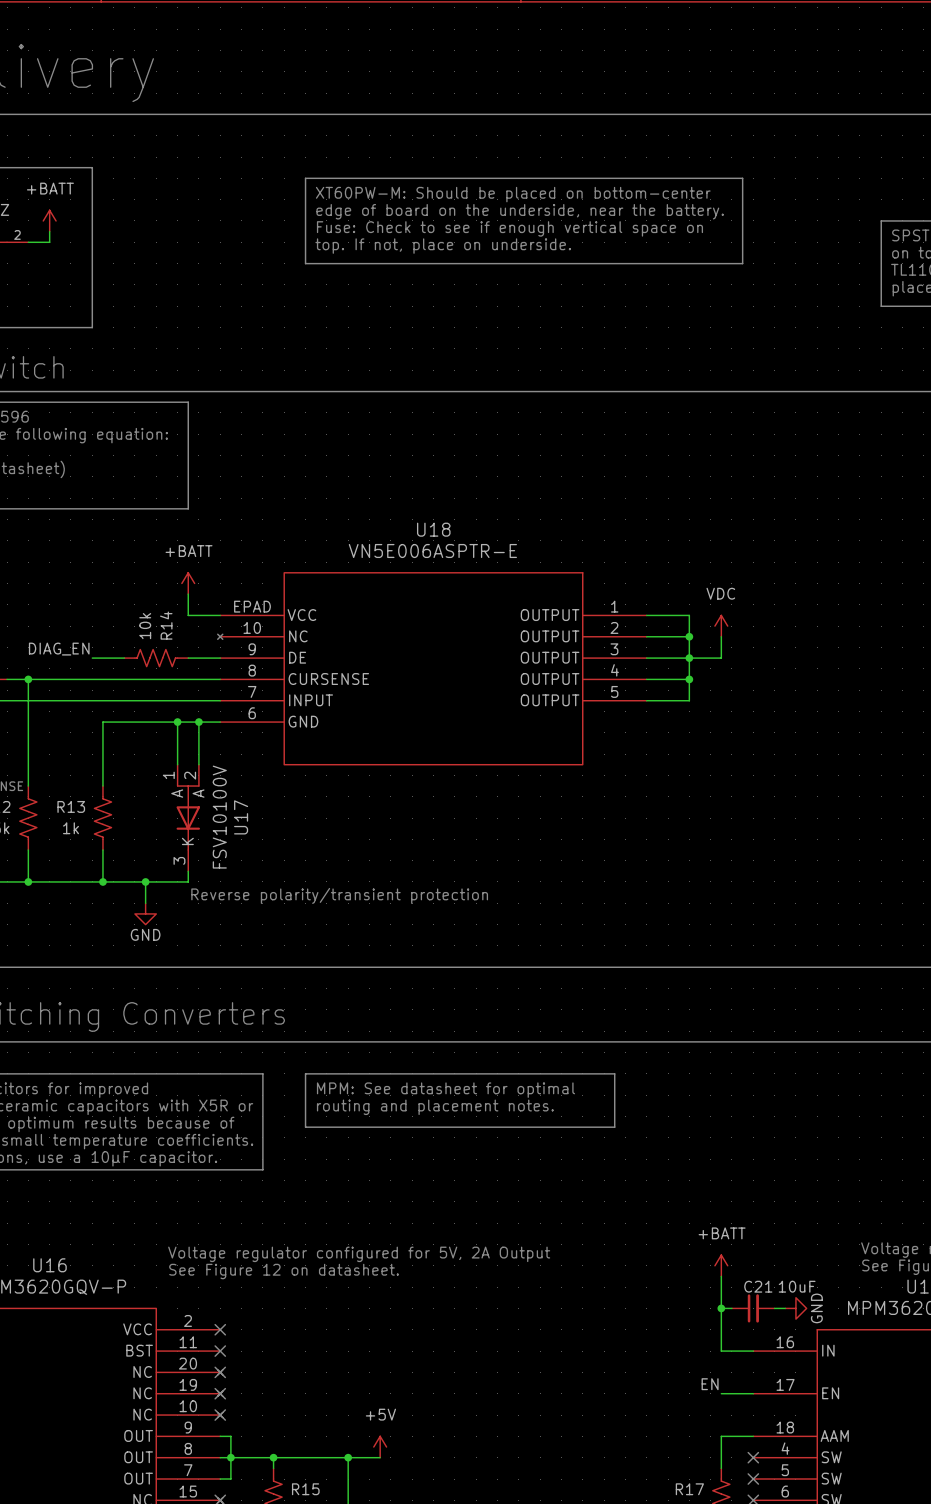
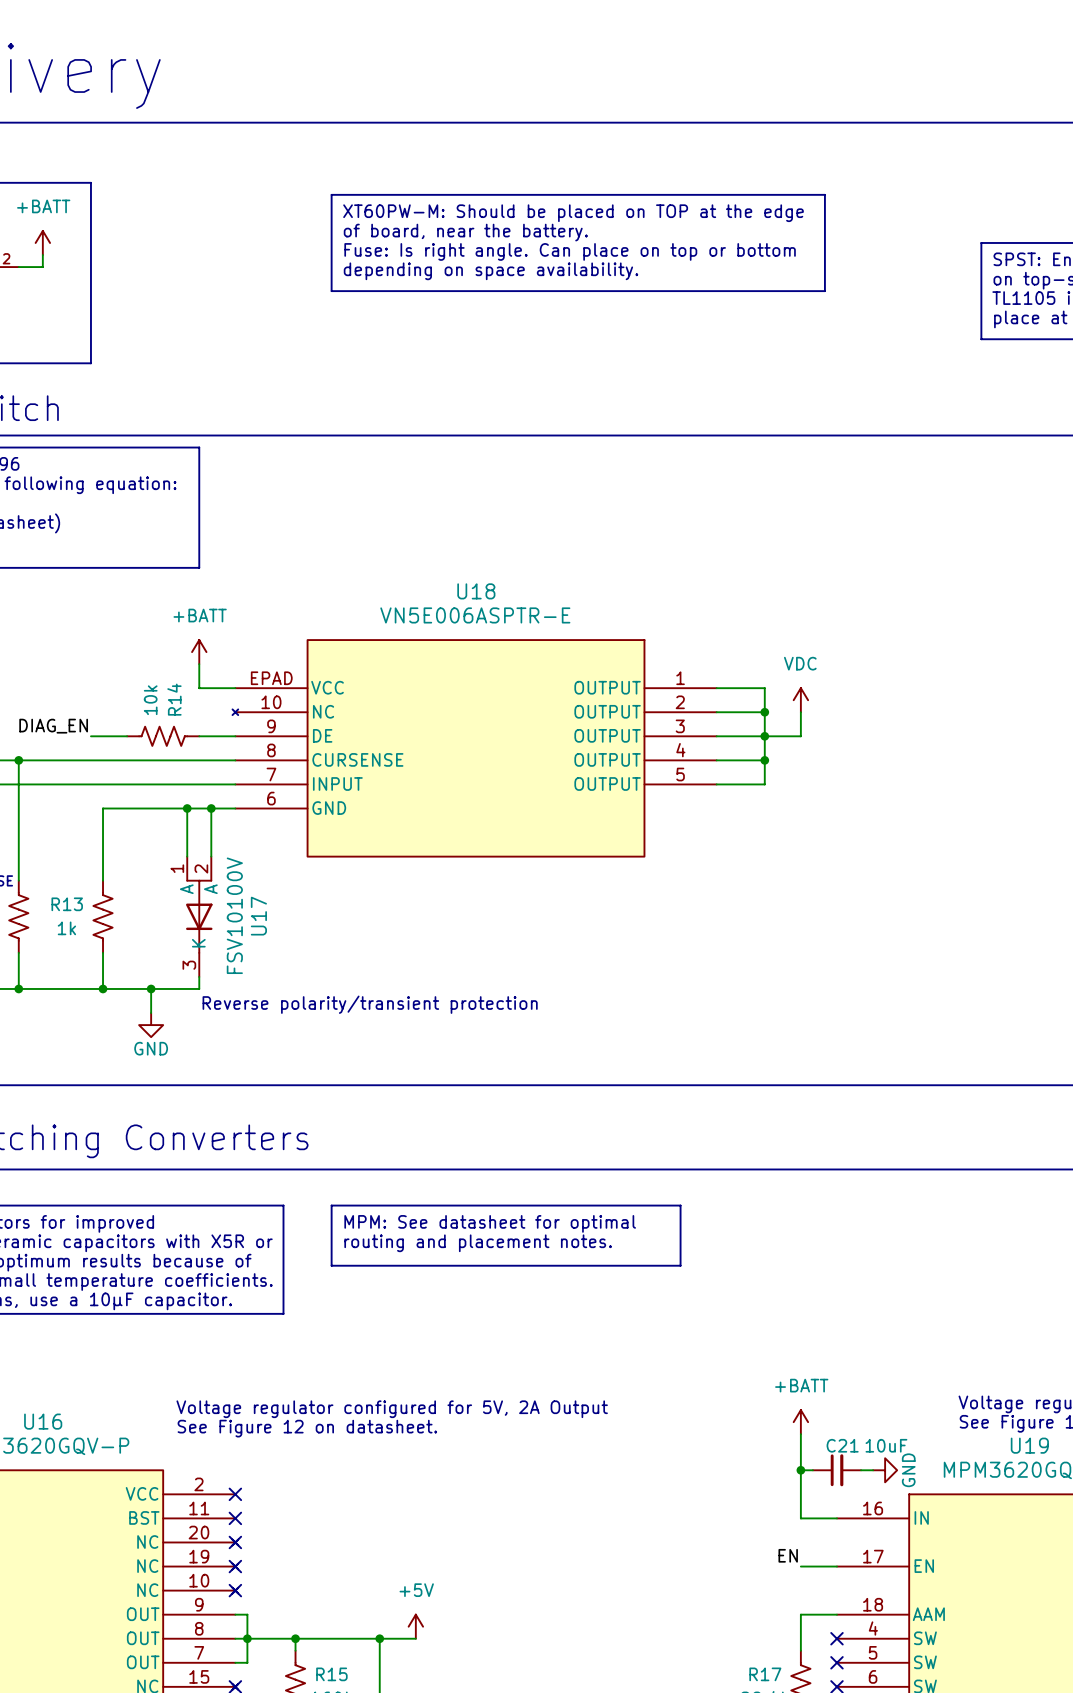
text: XT60PW-M: Should be placed on bottom-center (513, 194) -> XT60PW-M: Should be placed on TOP at the edge (573, 213)
text: edge of board on the underside, near the battery. (520, 211) -> of board, near the battery. (465, 232)
text: Fuse: Check to see if enough vertical space on (509, 228) -> Fuse: Is right angle. Can place on top or bottom (570, 251)
text: top. If not, place on underside. (443, 246) -> depending on space availability. (491, 271)

